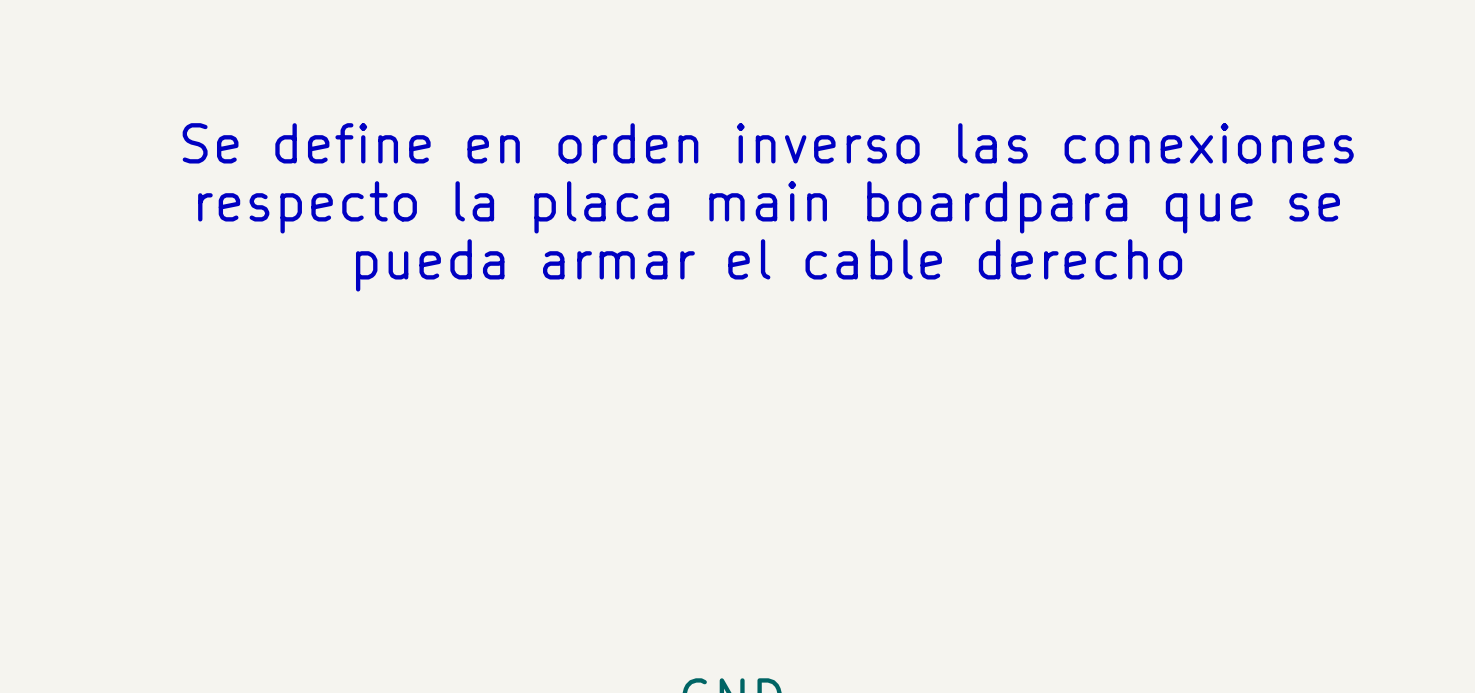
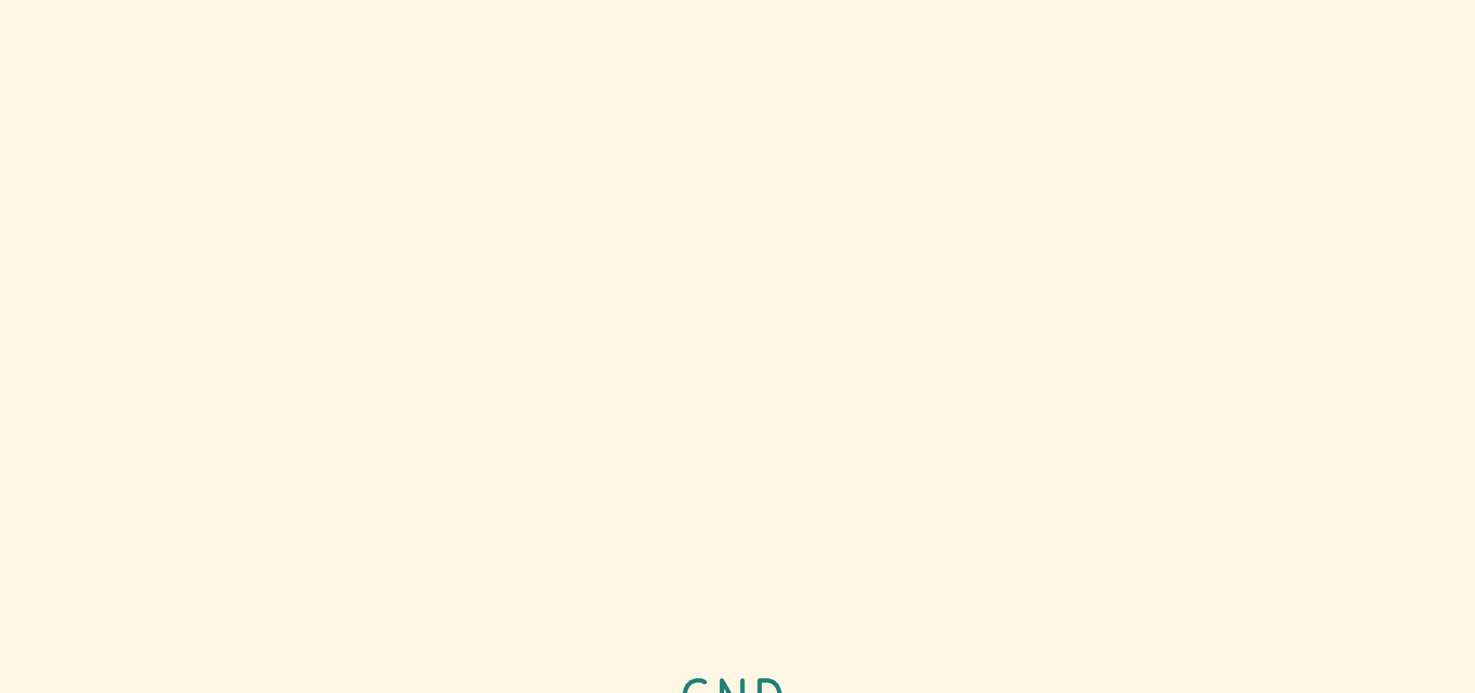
text: Se define en orden inverso las conexiones (768, 143) -> none
text: respecto la placa main boardpara que se (769, 207) -> none
text: pueda armar el cable derecho (769, 265) -> none

